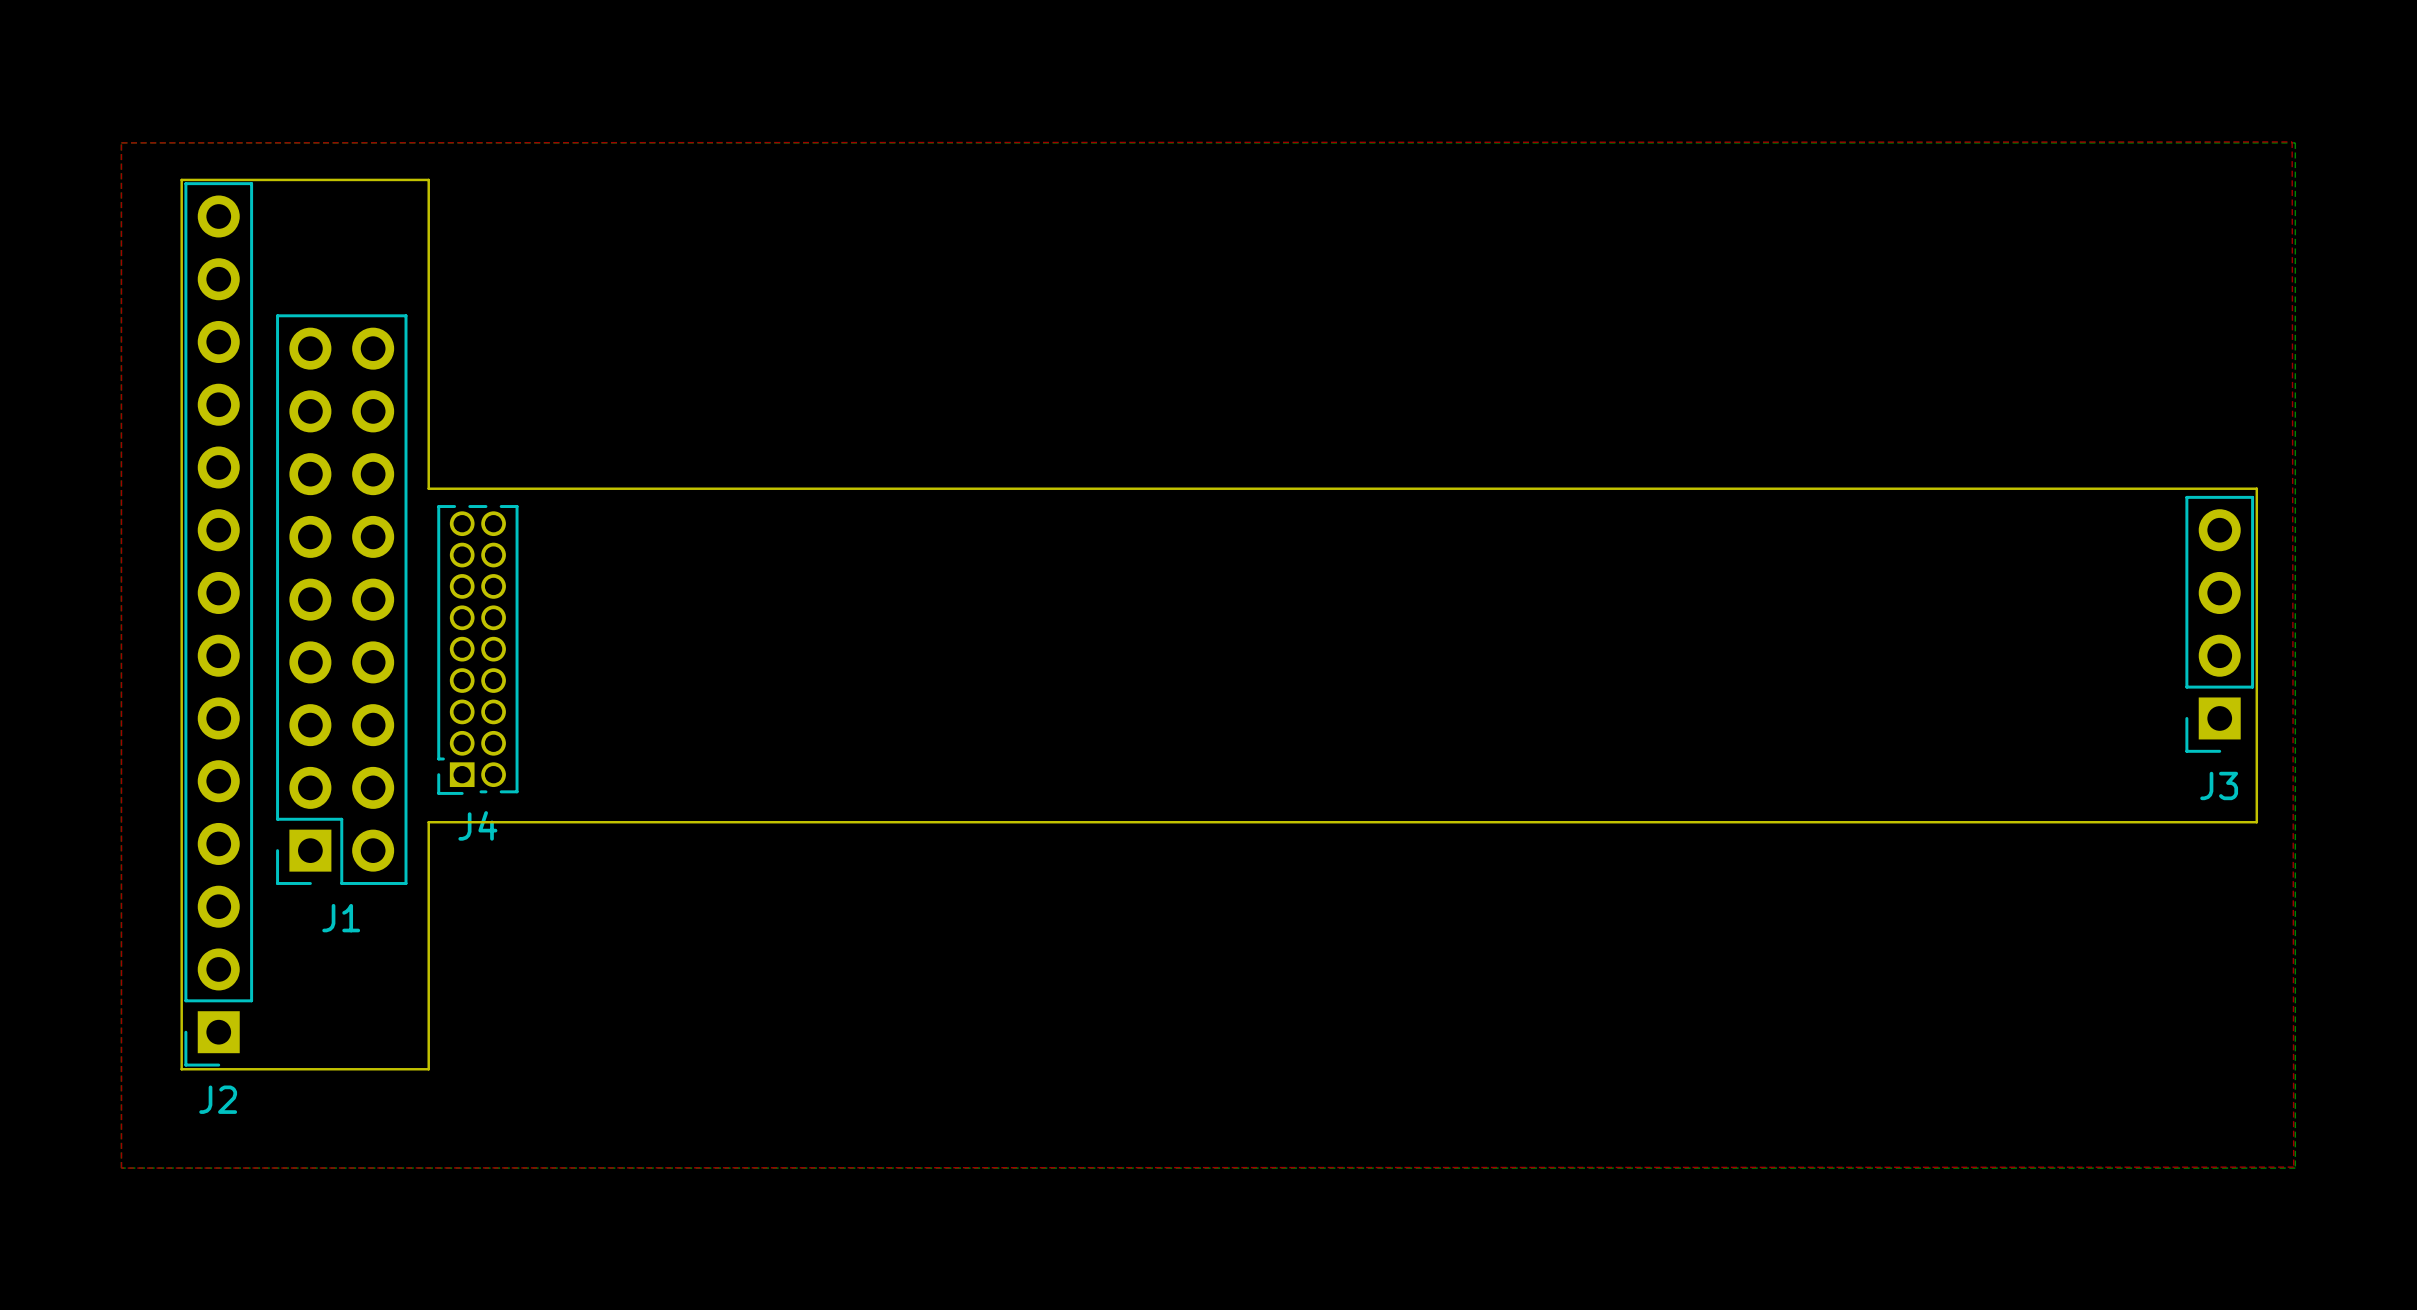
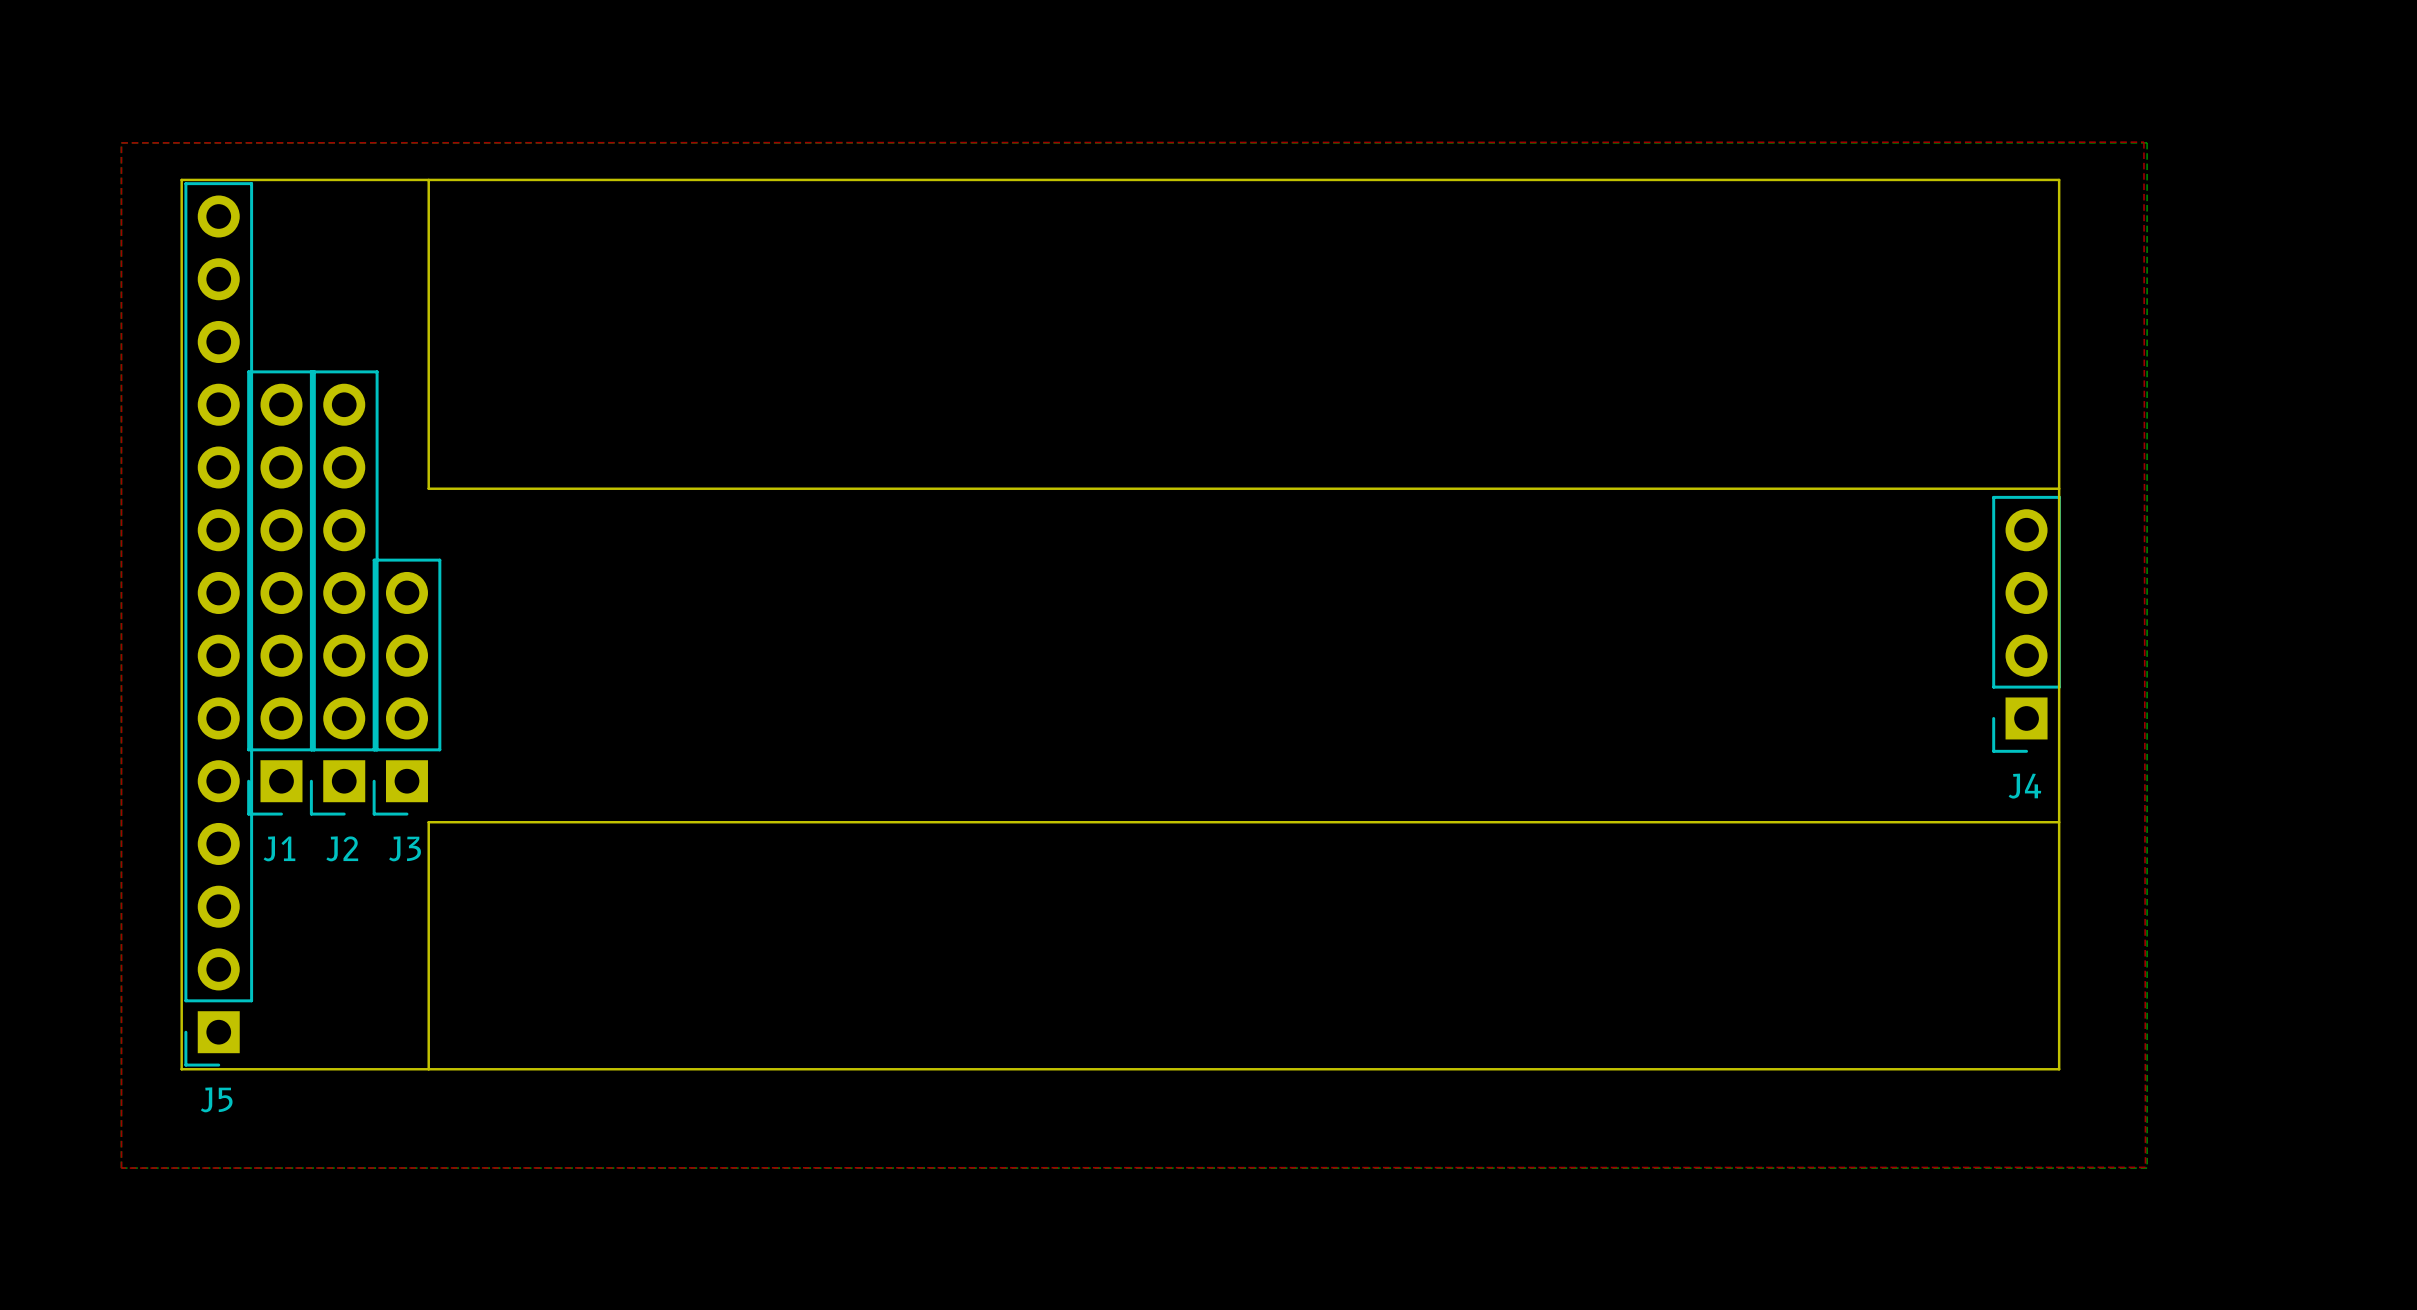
top zone outline: (121, 142) (2292, 141) (2293, 1167) (121, 1168) -> (121, 142) (2143, 142) (2145, 1167) (121, 1168)
bottom zone outline: (2147, 142) (2295, 142) (2295, 1168) (2147, 1168) -> (2147, 142) (2147, 1168)
board edge: none -> (428, 179) (2059, 179) (2059, 1069) (428, 1069)
J1 footprint: [276, 314, 408, 885] -> [247, 370, 316, 816]
board edge: (2059, 488) (2256, 488) (2256, 822) (2059, 822) -> none
J4 footprint: [437, 505, 519, 795] -> [1992, 495, 2061, 753]
J2: none -> (344, 592)
J3 position: (2219, 624) -> (406, 687)
J1 name position: J1 (341, 918) -> J1 (279, 848)
J2 name: J2 (218, 1099) -> J5 (216, 1099)

